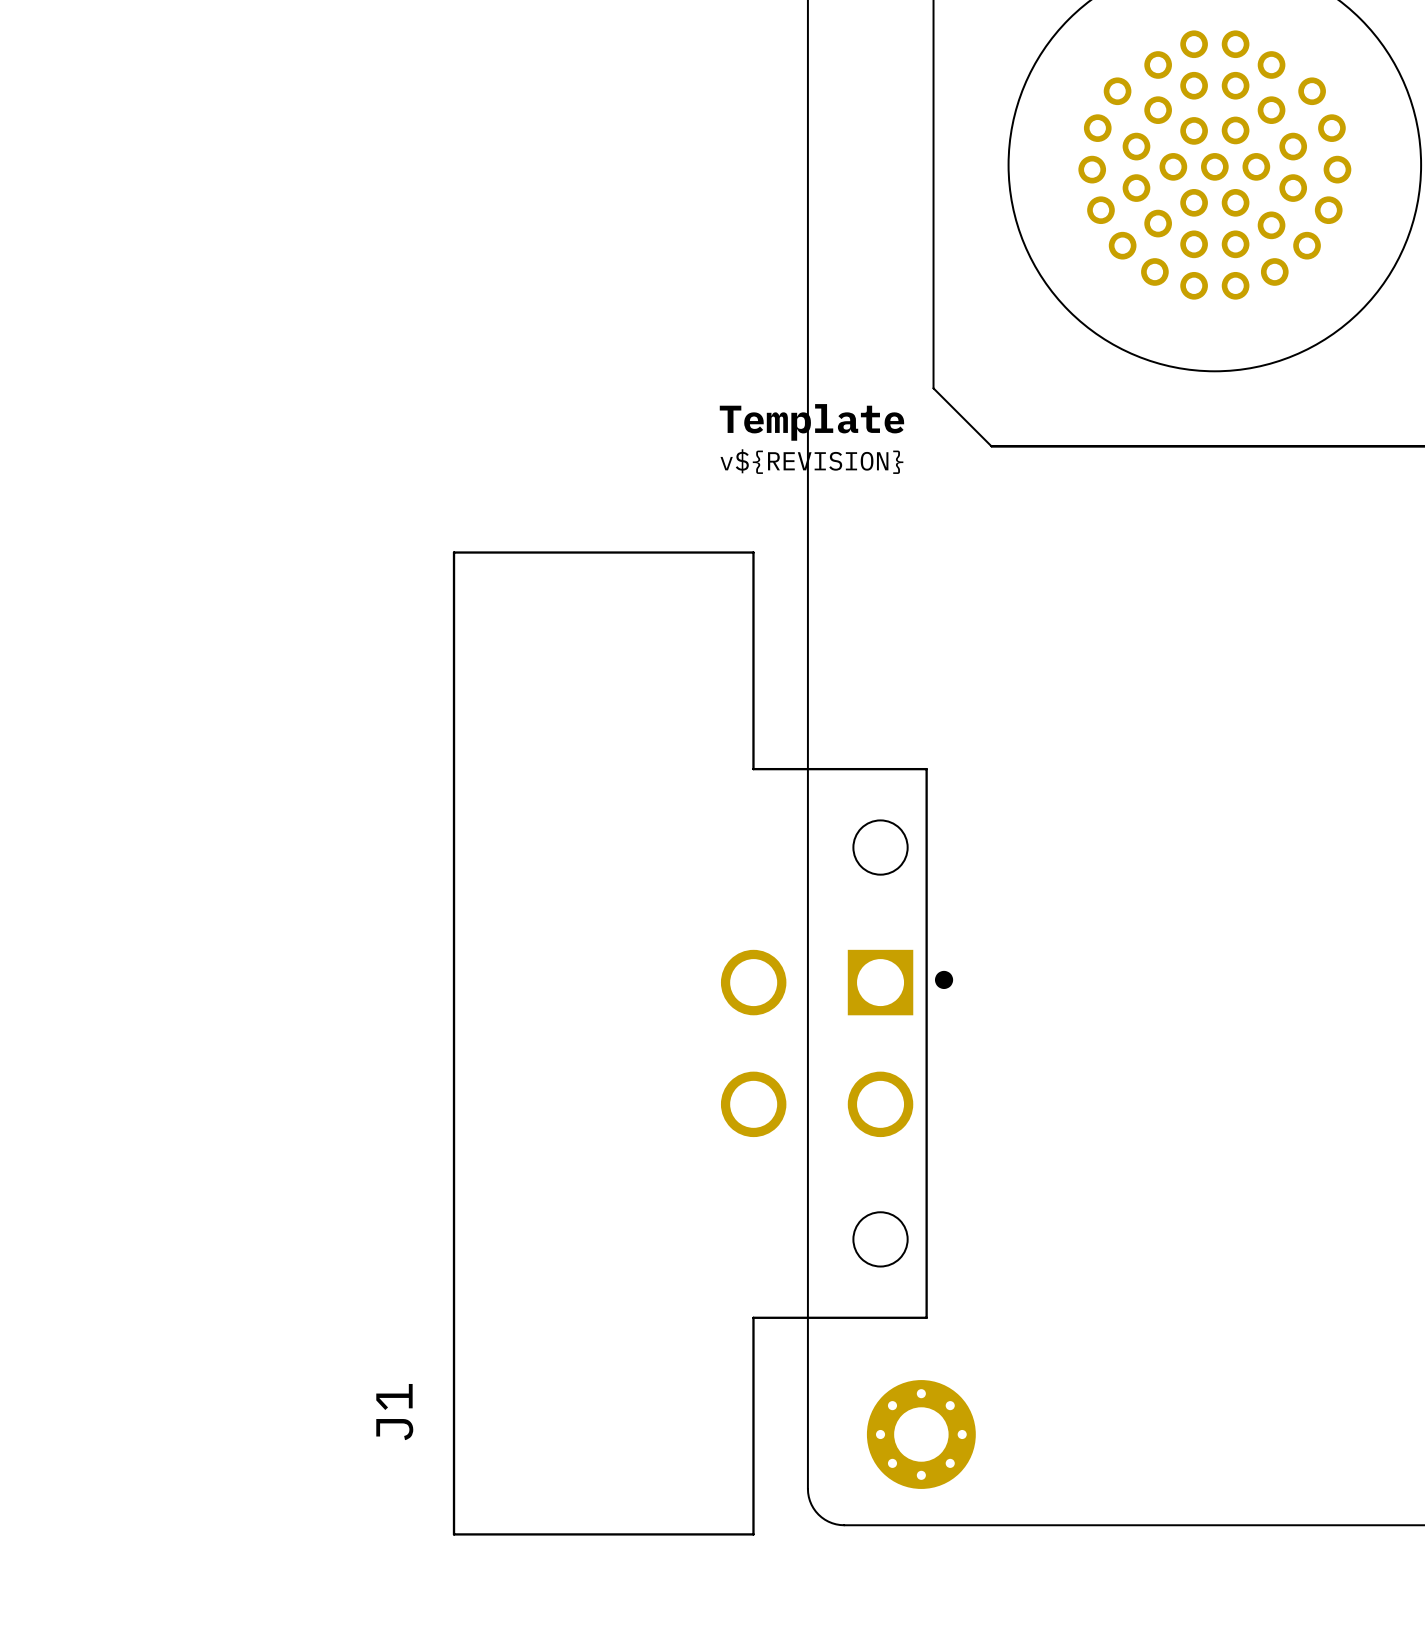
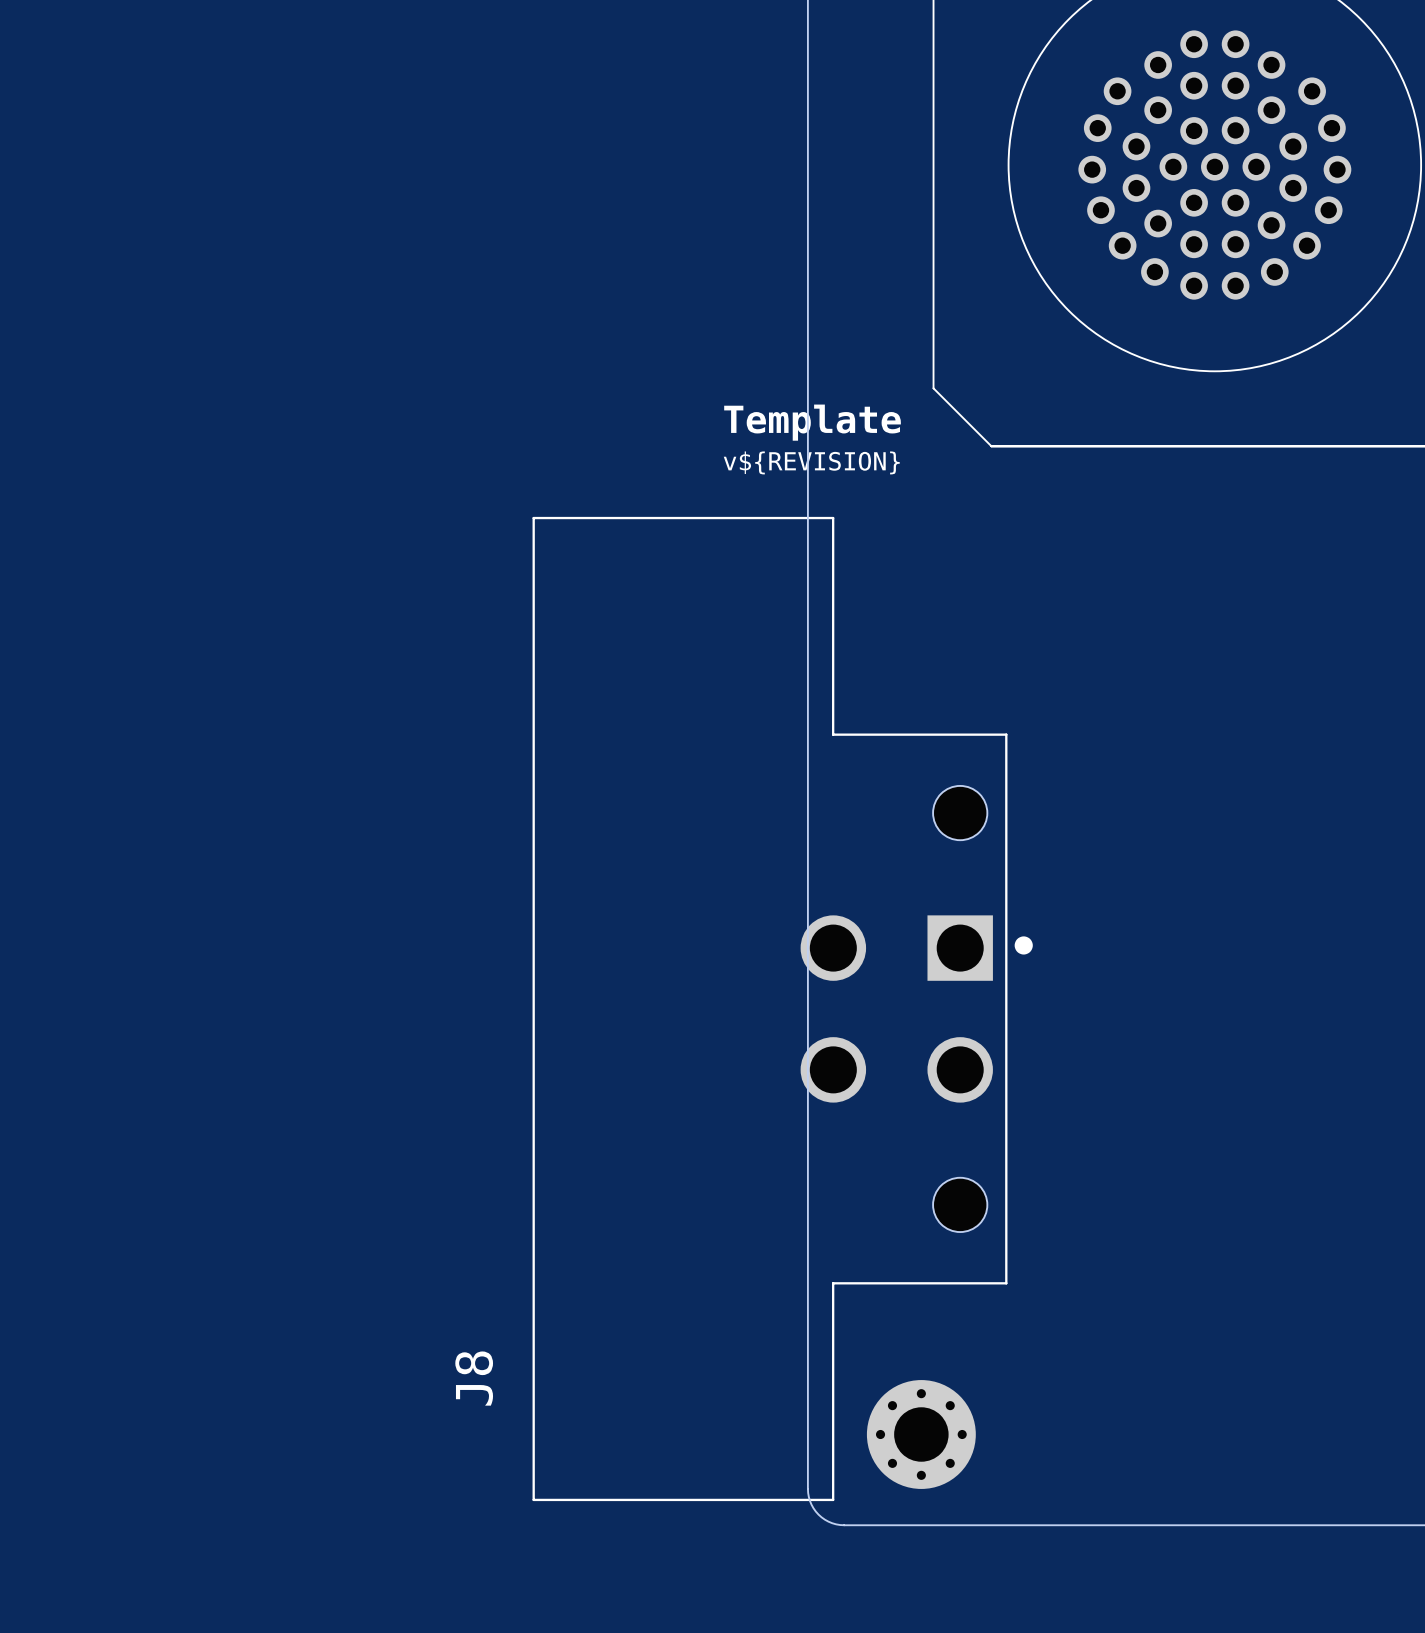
J8: none -> (782, 1008)
J1: (702, 1043) -> none

